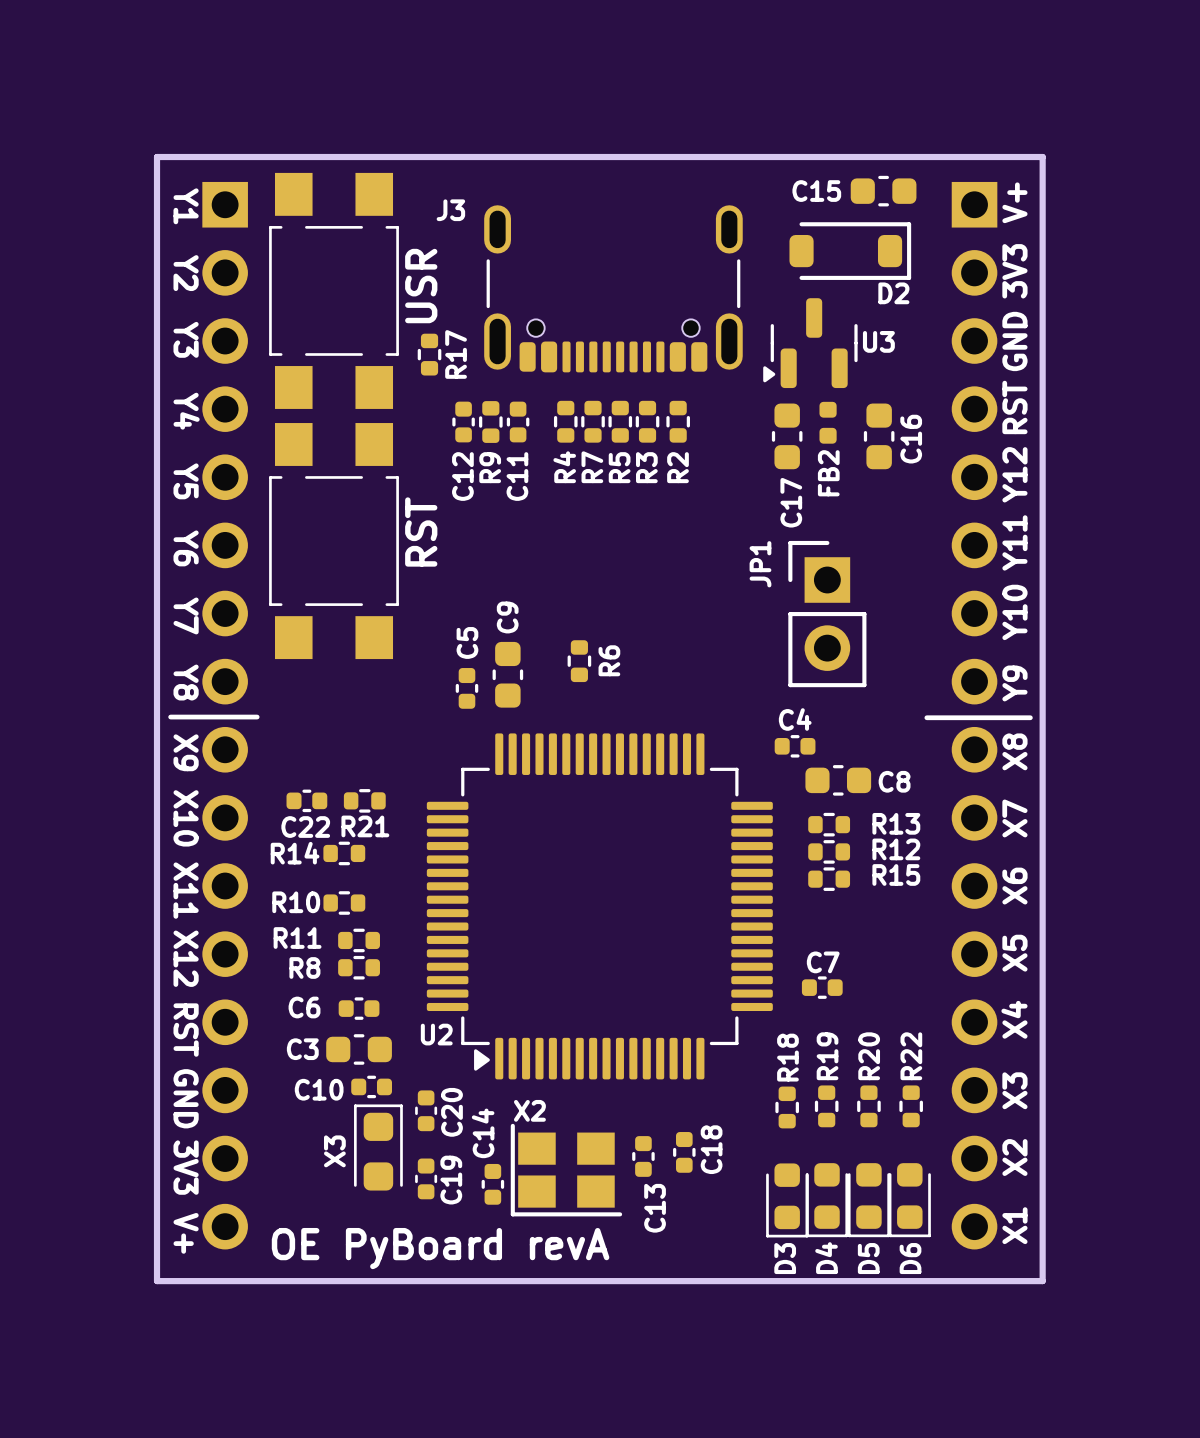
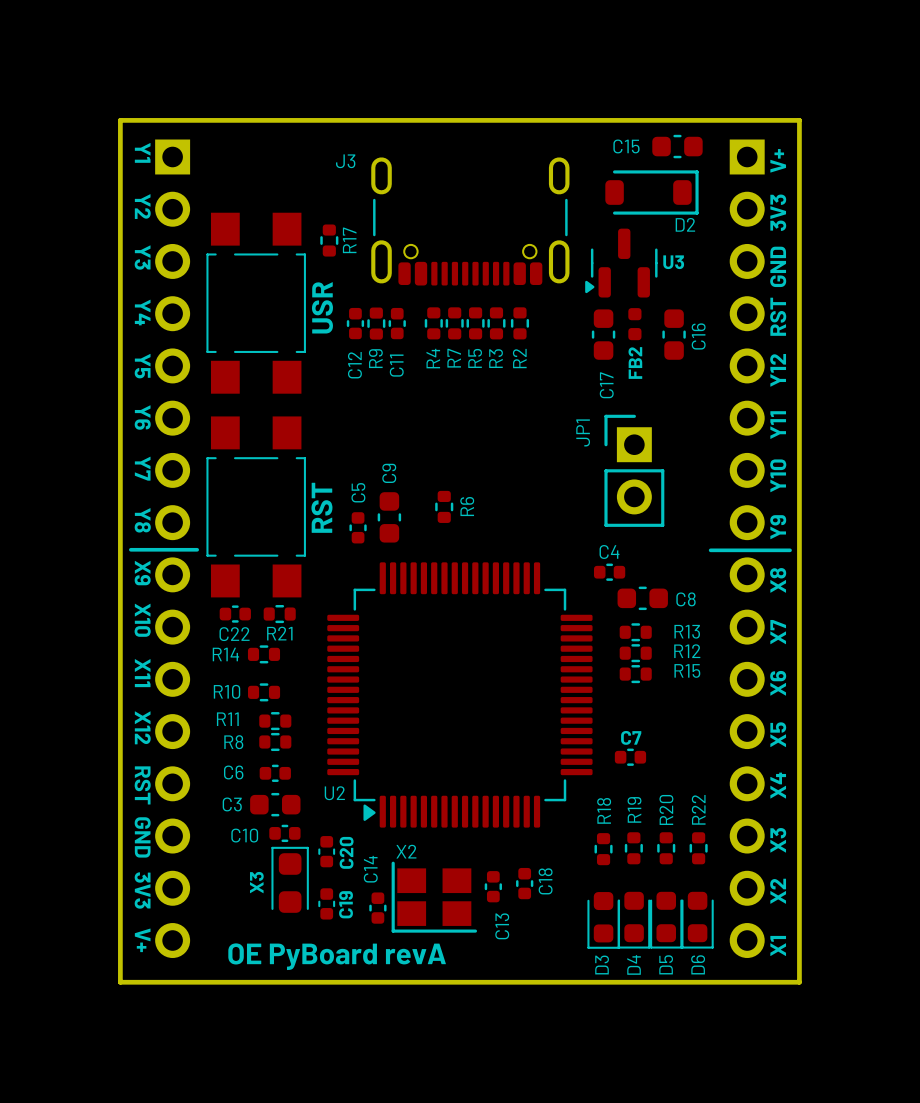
text position: USR (421, 286) -> USR (322, 307)
part: (334, 290) -> none
R17 position: (429, 354) -> (329, 240)
part: none -> (256, 303)
text position: RST (421, 531) -> RST (321, 507)
part: (334, 541) -> none
part: none -> (256, 506)

